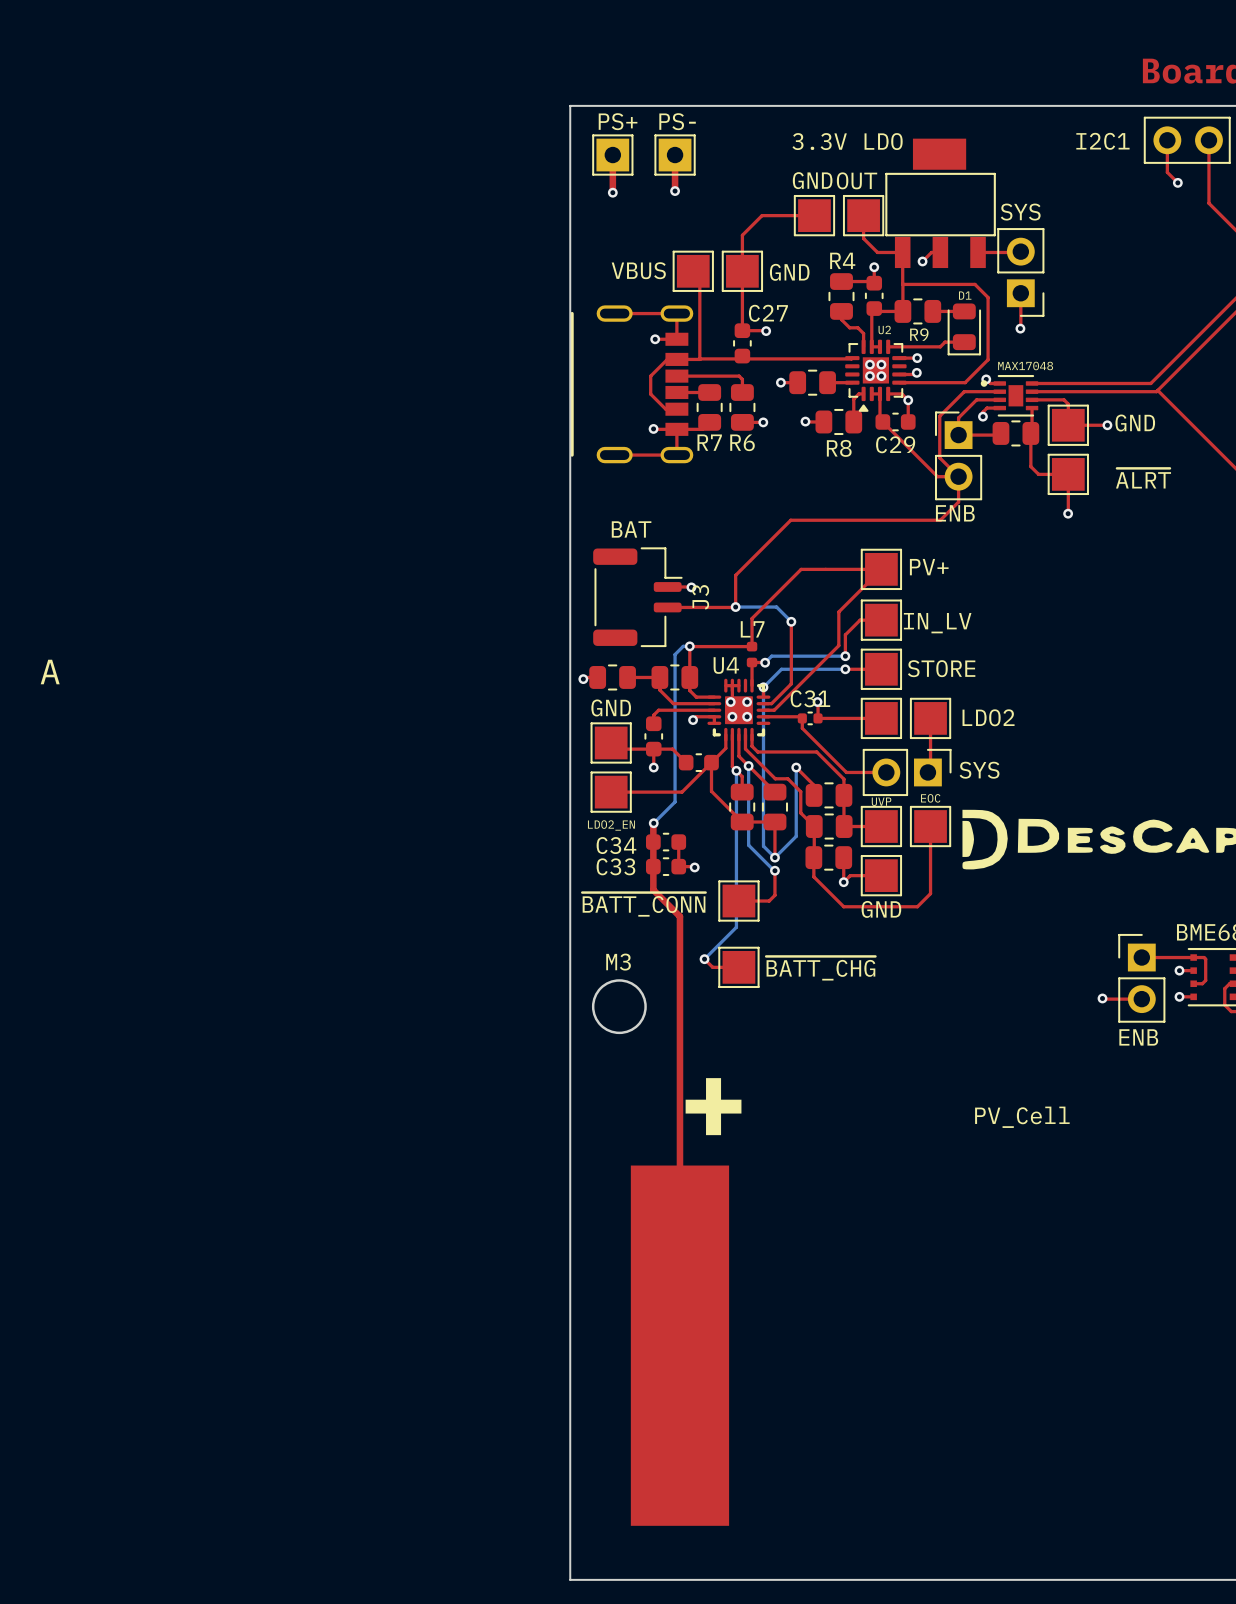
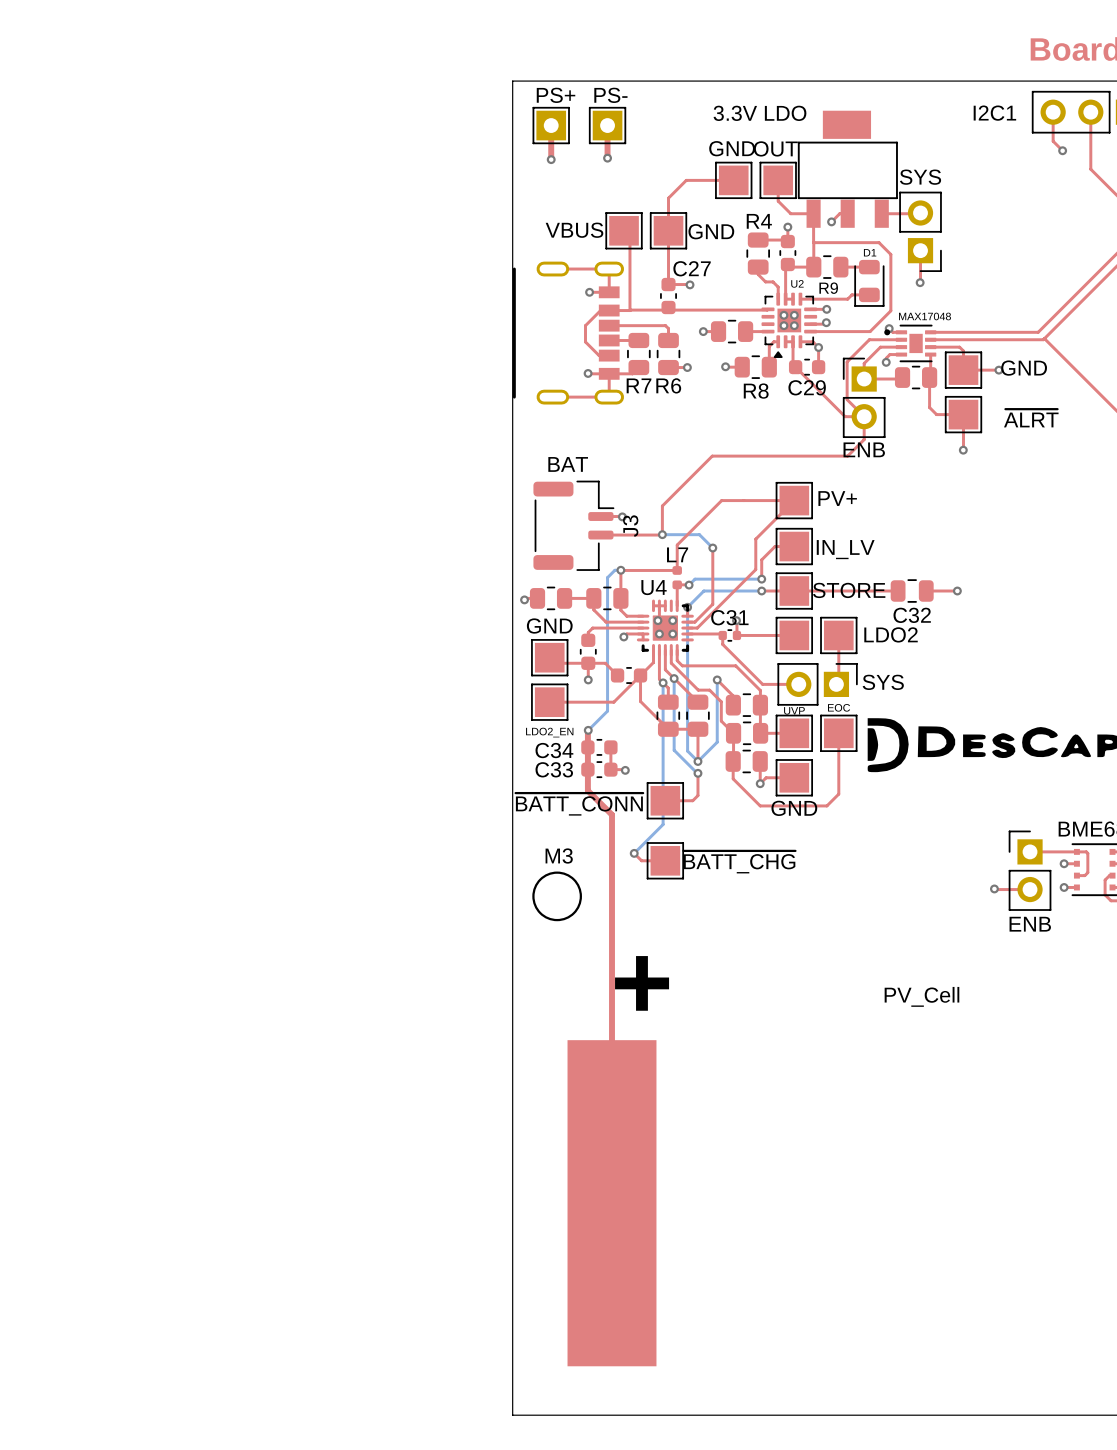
top track: none -> (794, 591) (898, 591)
C32: none -> (912, 591)
top track: none -> (926, 591) (957, 591)
via: none -> (957, 591)
text: A (50, 672) -> none

